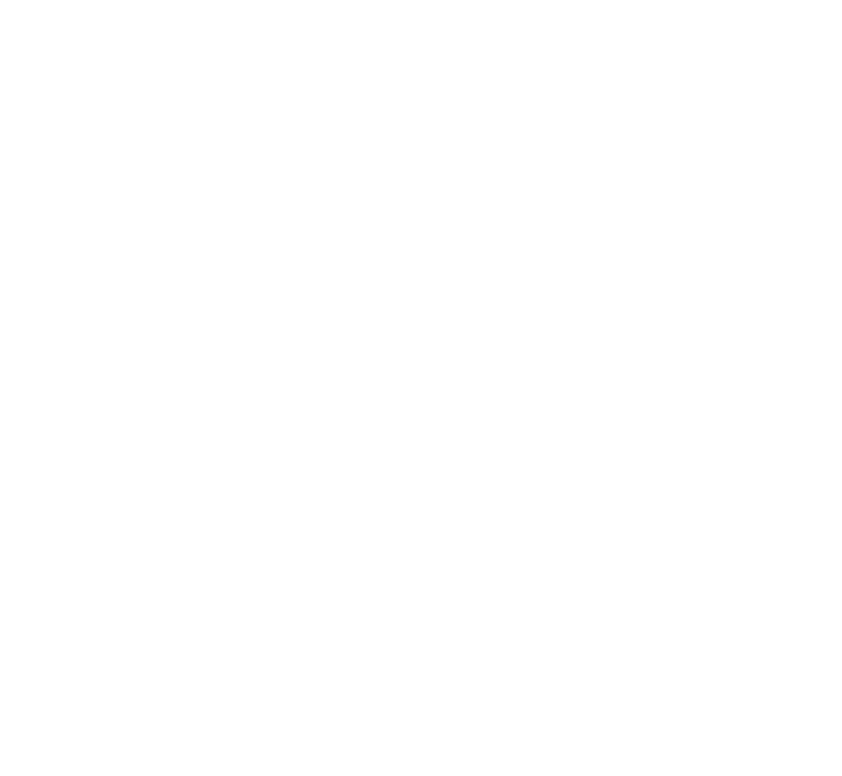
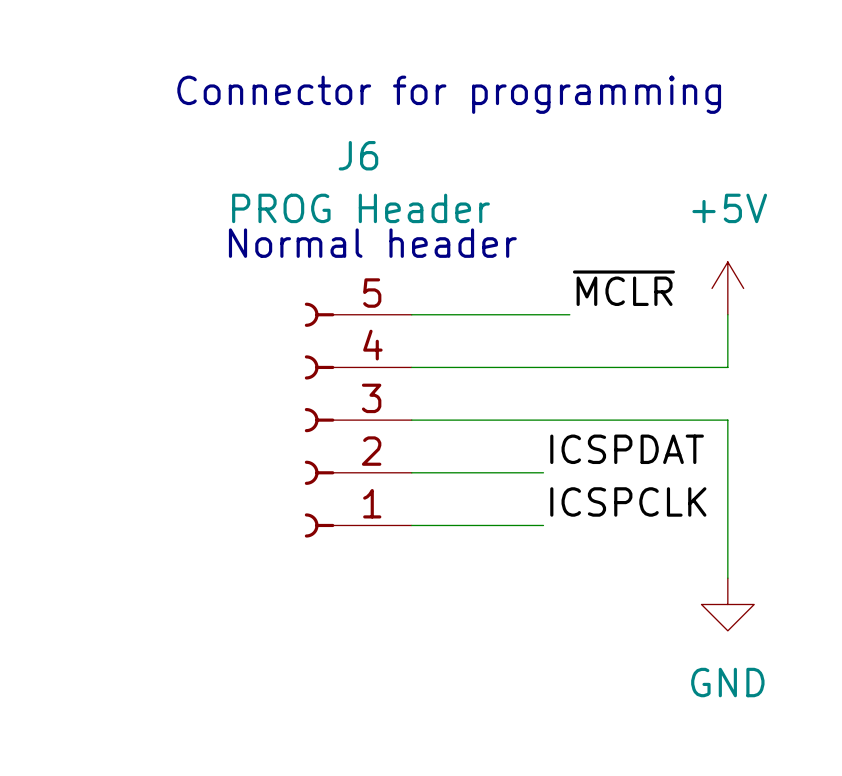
text: none -> Connector for programming (449, 94)
text: none -> Normal header (372, 243)
label: none -> ~{MCLR} (623, 288)
power symbol: none -> +5V (727, 288)
wire: none -> (411, 314) (569, 314)
wire: none -> (727, 314) (727, 367) (411, 367)
J6: none -> PROG Header (358, 420)
wire: none -> (411, 420) (727, 420) (727, 578)
label: none -> ICSPDAT (627, 449)
wire: none -> (411, 472) (543, 472)
label: none -> ICSPCLK (628, 501)
wire: none -> (411, 525) (543, 525)
power symbol: none -> GND (727, 604)

